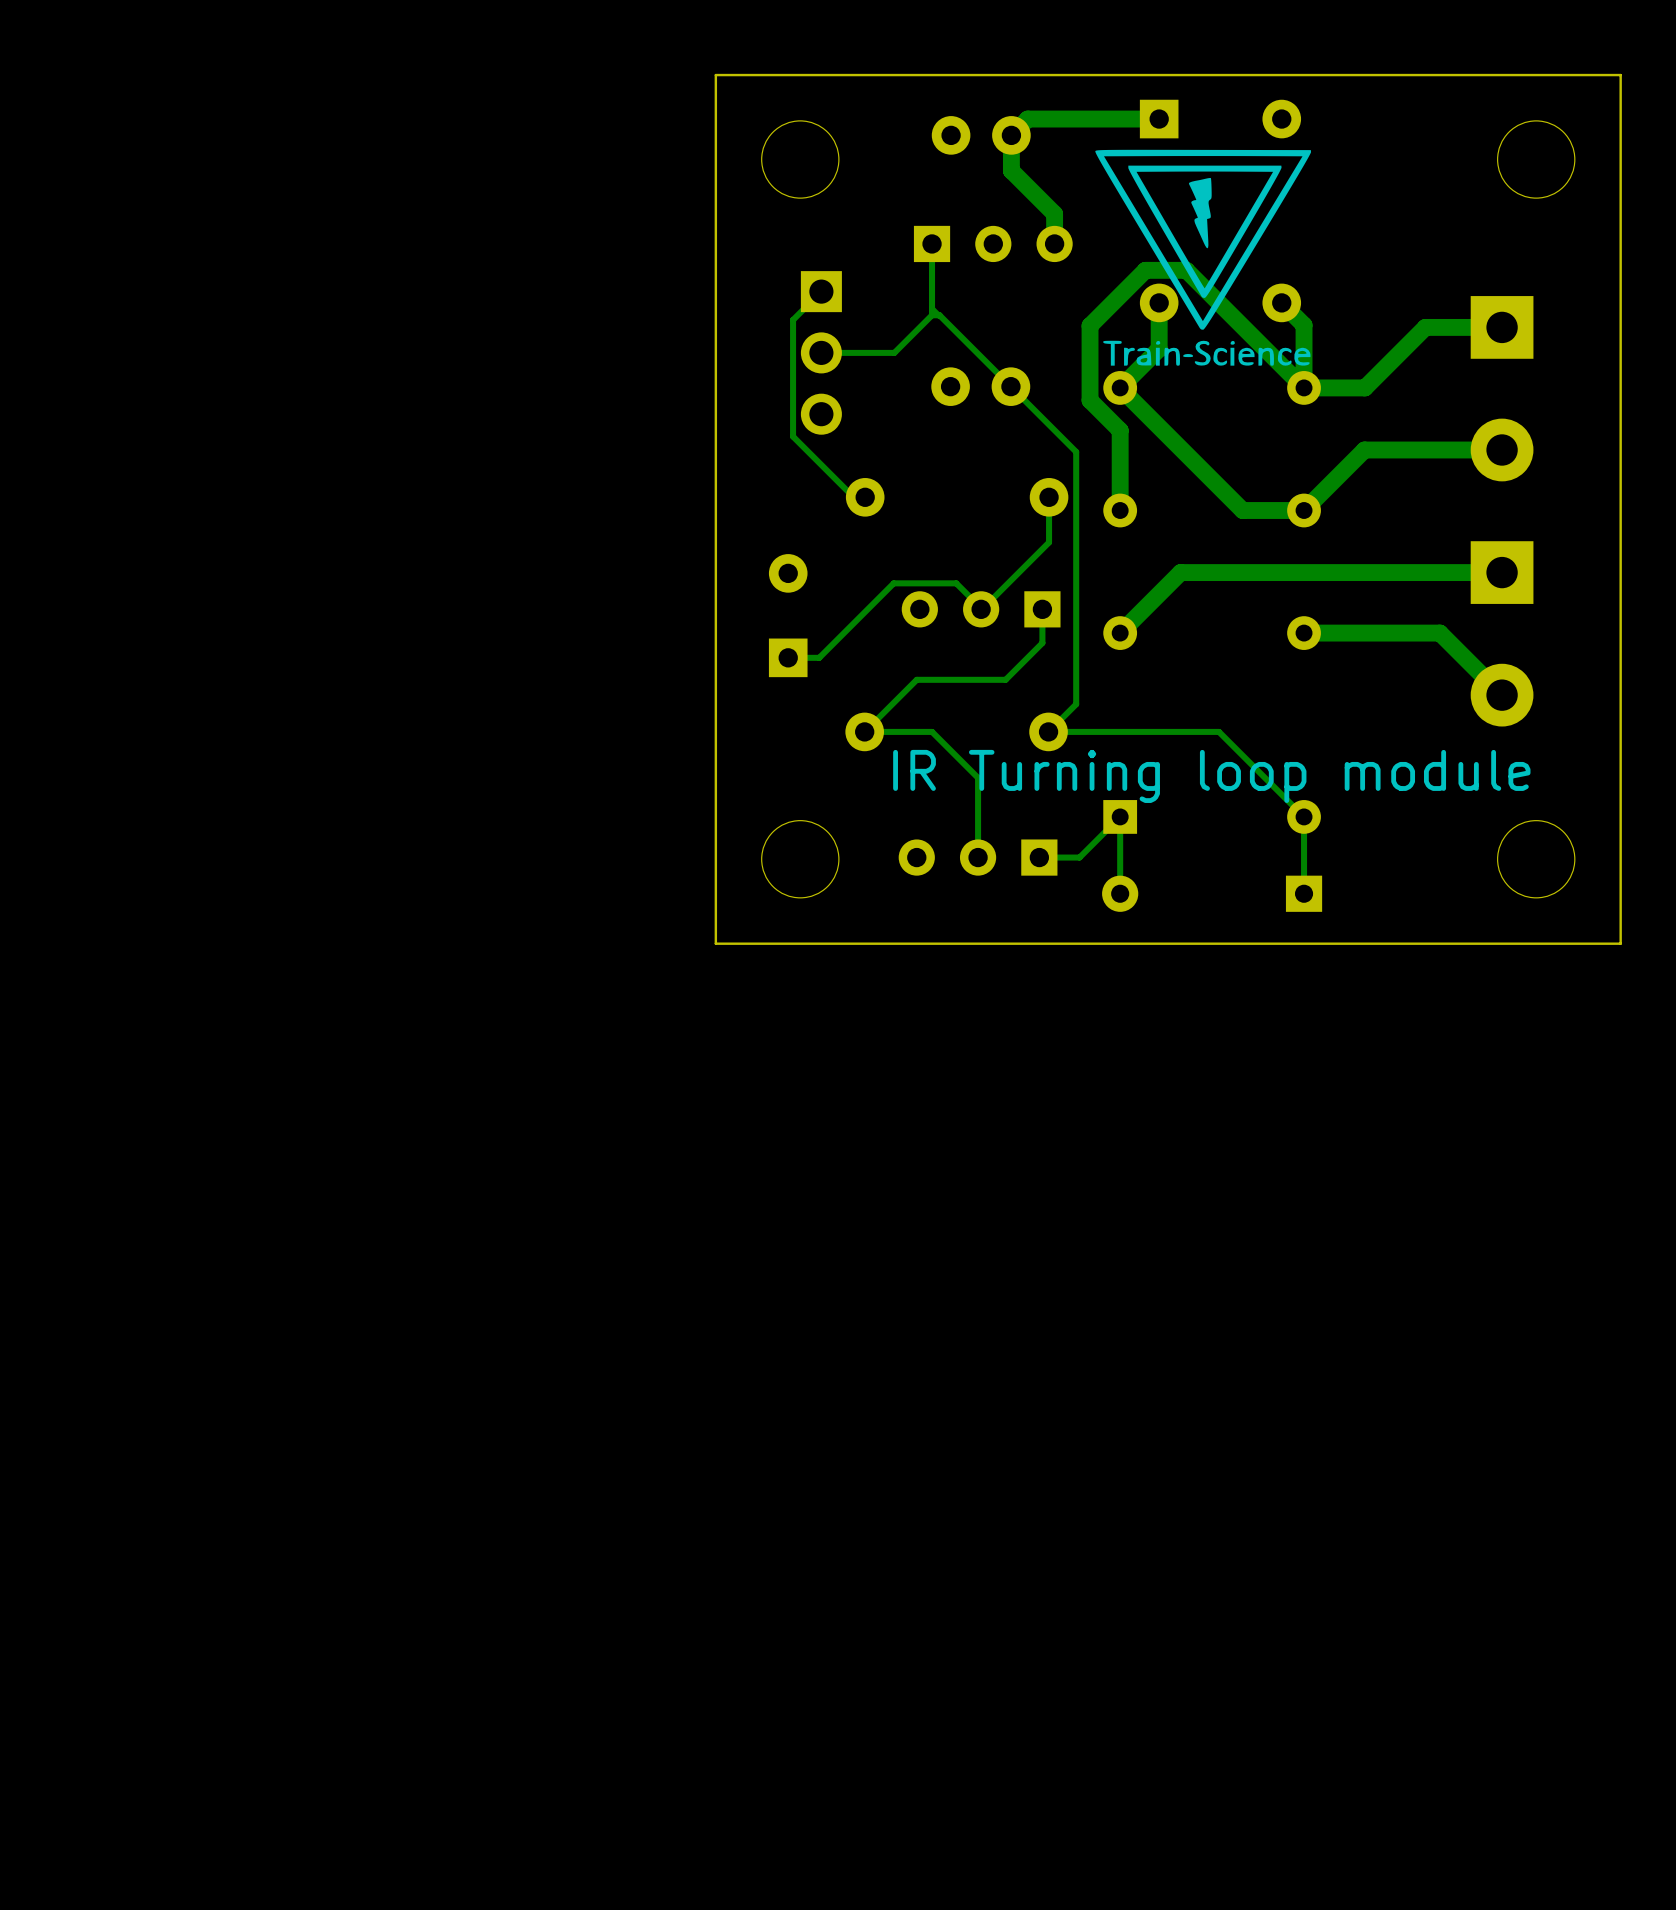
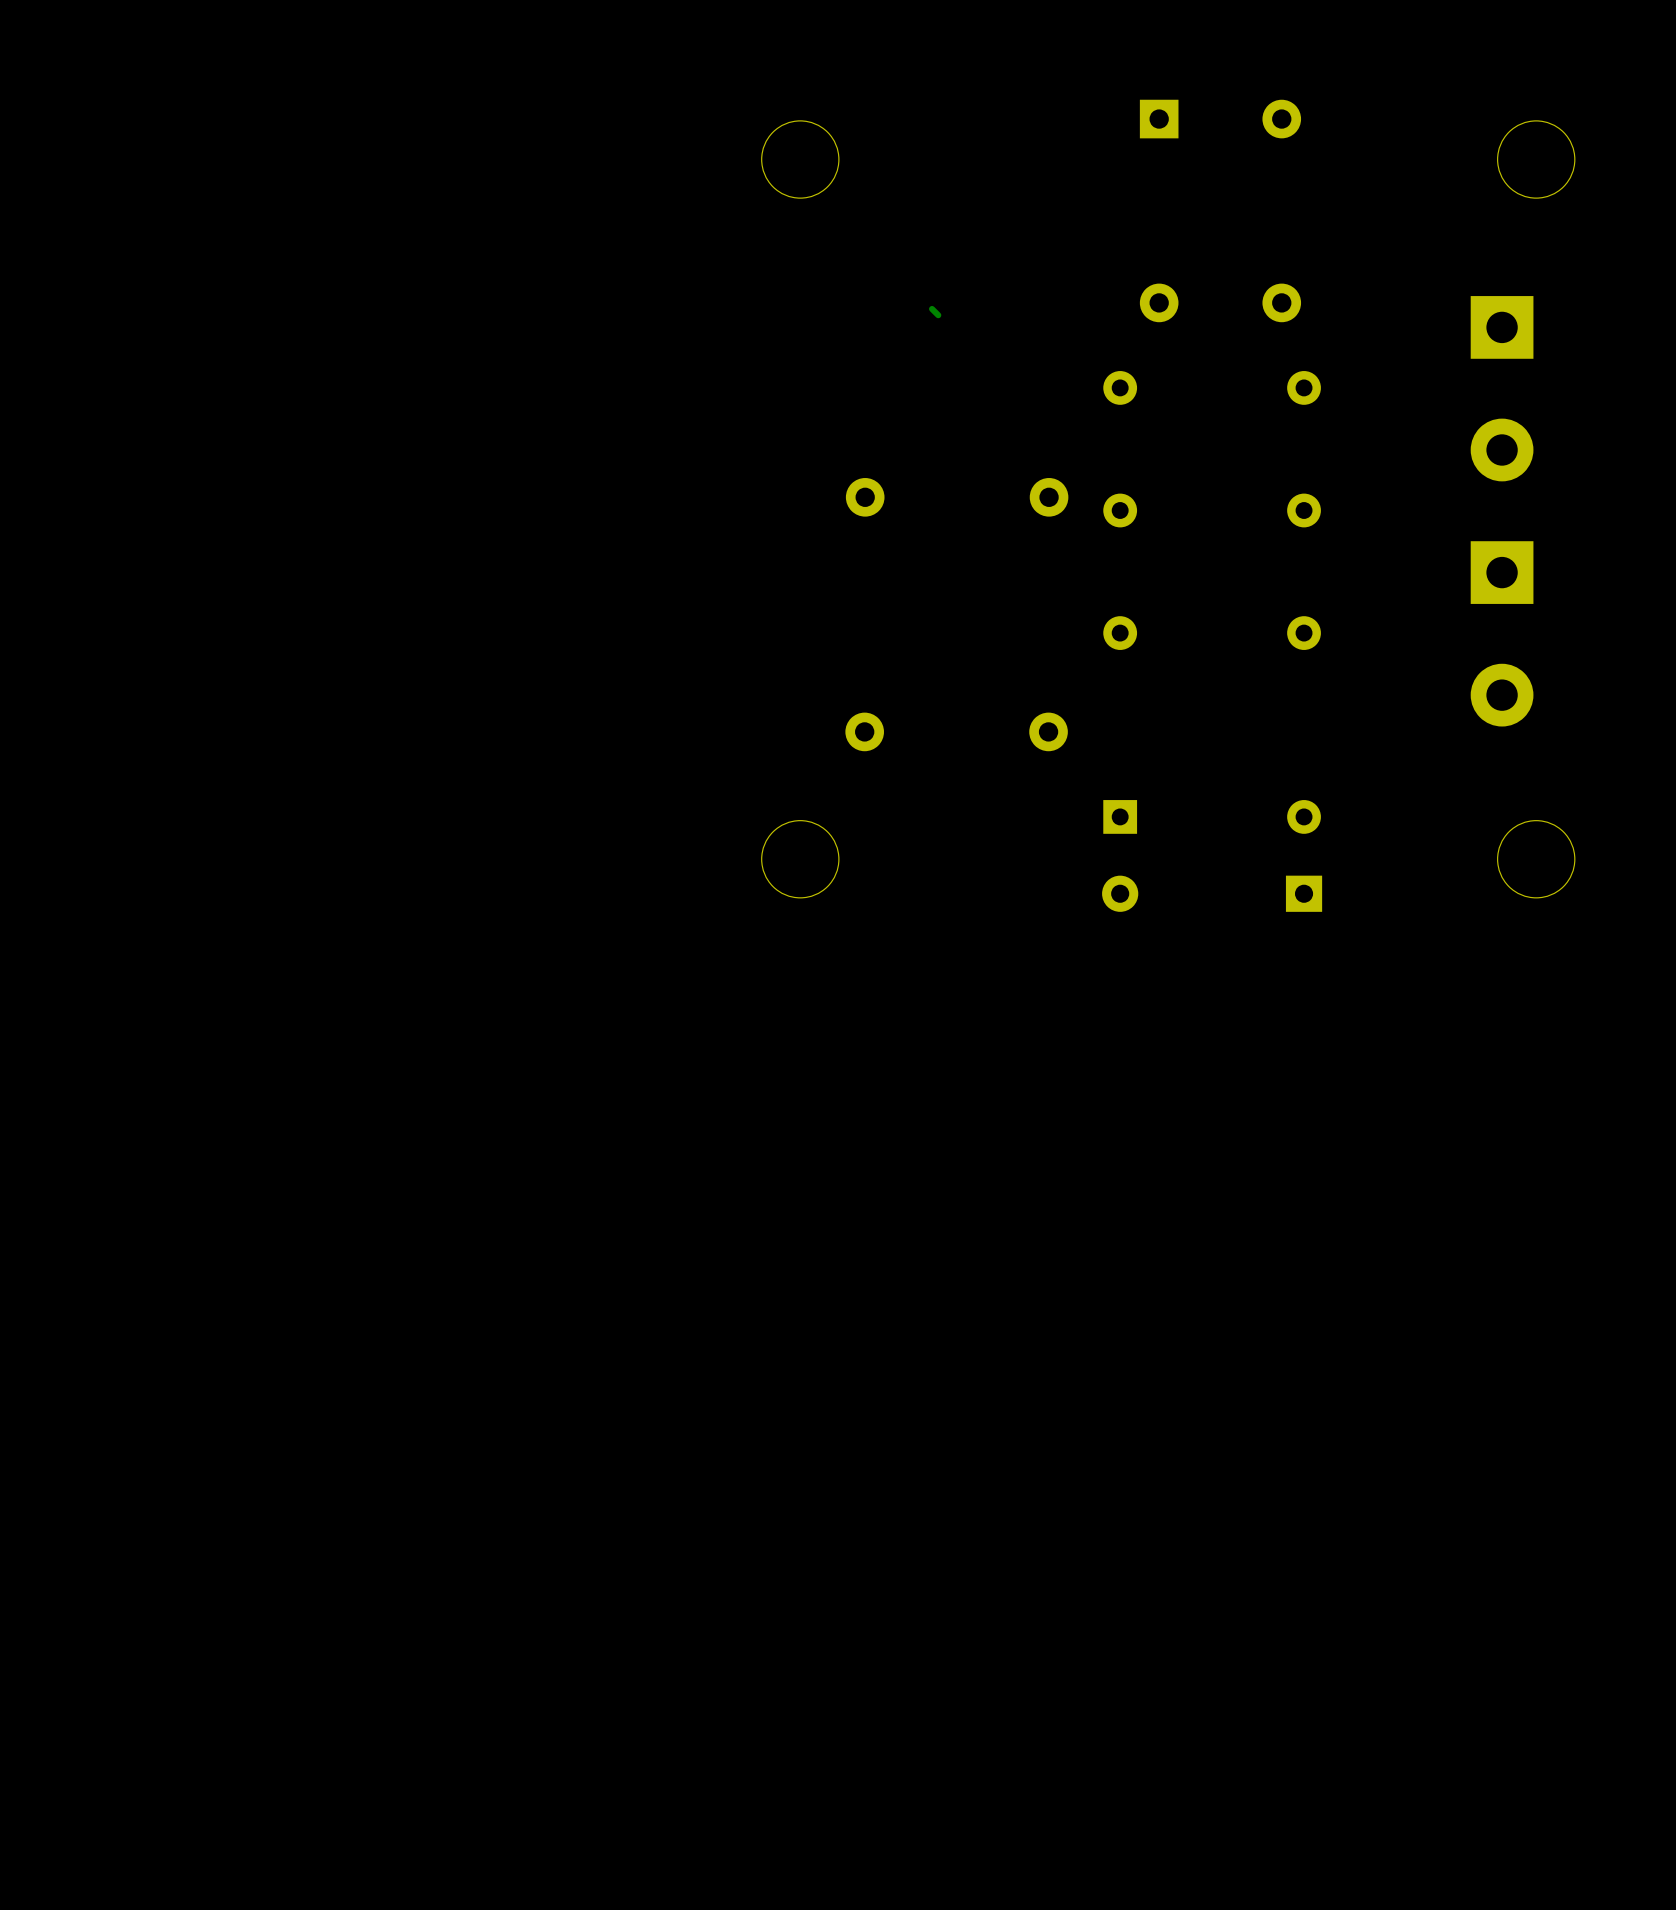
board edge: (1620, 75) (715, 75) (715, 943) (1620, 943) (1620, 75) -> none
track: (1159, 119) (1027, 119) (1011, 135) (1011, 170) (1054, 213) (1054, 243) -> none
part: (981, 135) -> none
drawing: [1095, 149, 1312, 366] -> none
track: (932, 243) (932, 315) -> none
part: (993, 243) -> none
track: (821, 291) (793, 319) (793, 436) (853, 497) (865, 497) -> none
track: (1159, 302) (1159, 348) (1120, 387) (1242, 510) (1304, 510) (1364, 450) (1502, 450) -> none
track: (1281, 302) (1304, 325) (1304, 387) -> none
track: (932, 315) (894, 352) (821, 352) -> none
track: (932, 315) (939, 315) (1076, 451) (1076, 704) (1048, 731) (1219, 731) (1304, 816) (1304, 893) -> none
track: (1502, 327) (1425, 327) (1364, 387) (1304, 387) -> none
part: (821, 352) -> none
part: (980, 386) -> none
track: (1304, 387) (1186, 270) (1145, 270) (1090, 325) (1090, 400) (1120, 430) (1120, 510) -> none
track: (1049, 497) (1049, 542) (982, 609) (956, 583) (893, 583) (819, 657) (788, 657) -> none
track: (1502, 572) (1180, 572) (1120, 633) -> none
part: (981, 609) -> none
track: (1042, 609) (1042, 643) (1005, 679) (916, 679) (864, 731) (932, 731) (978, 777) (978, 857) -> none
part: (788, 615) -> none
track: (1304, 633) (1440, 633) (1502, 695) -> none
text: IR Turning loop module (1211, 776) -> none
part: (978, 857) -> none
track: (1039, 857) (1079, 857) (1120, 816) (1120, 893) -> none

